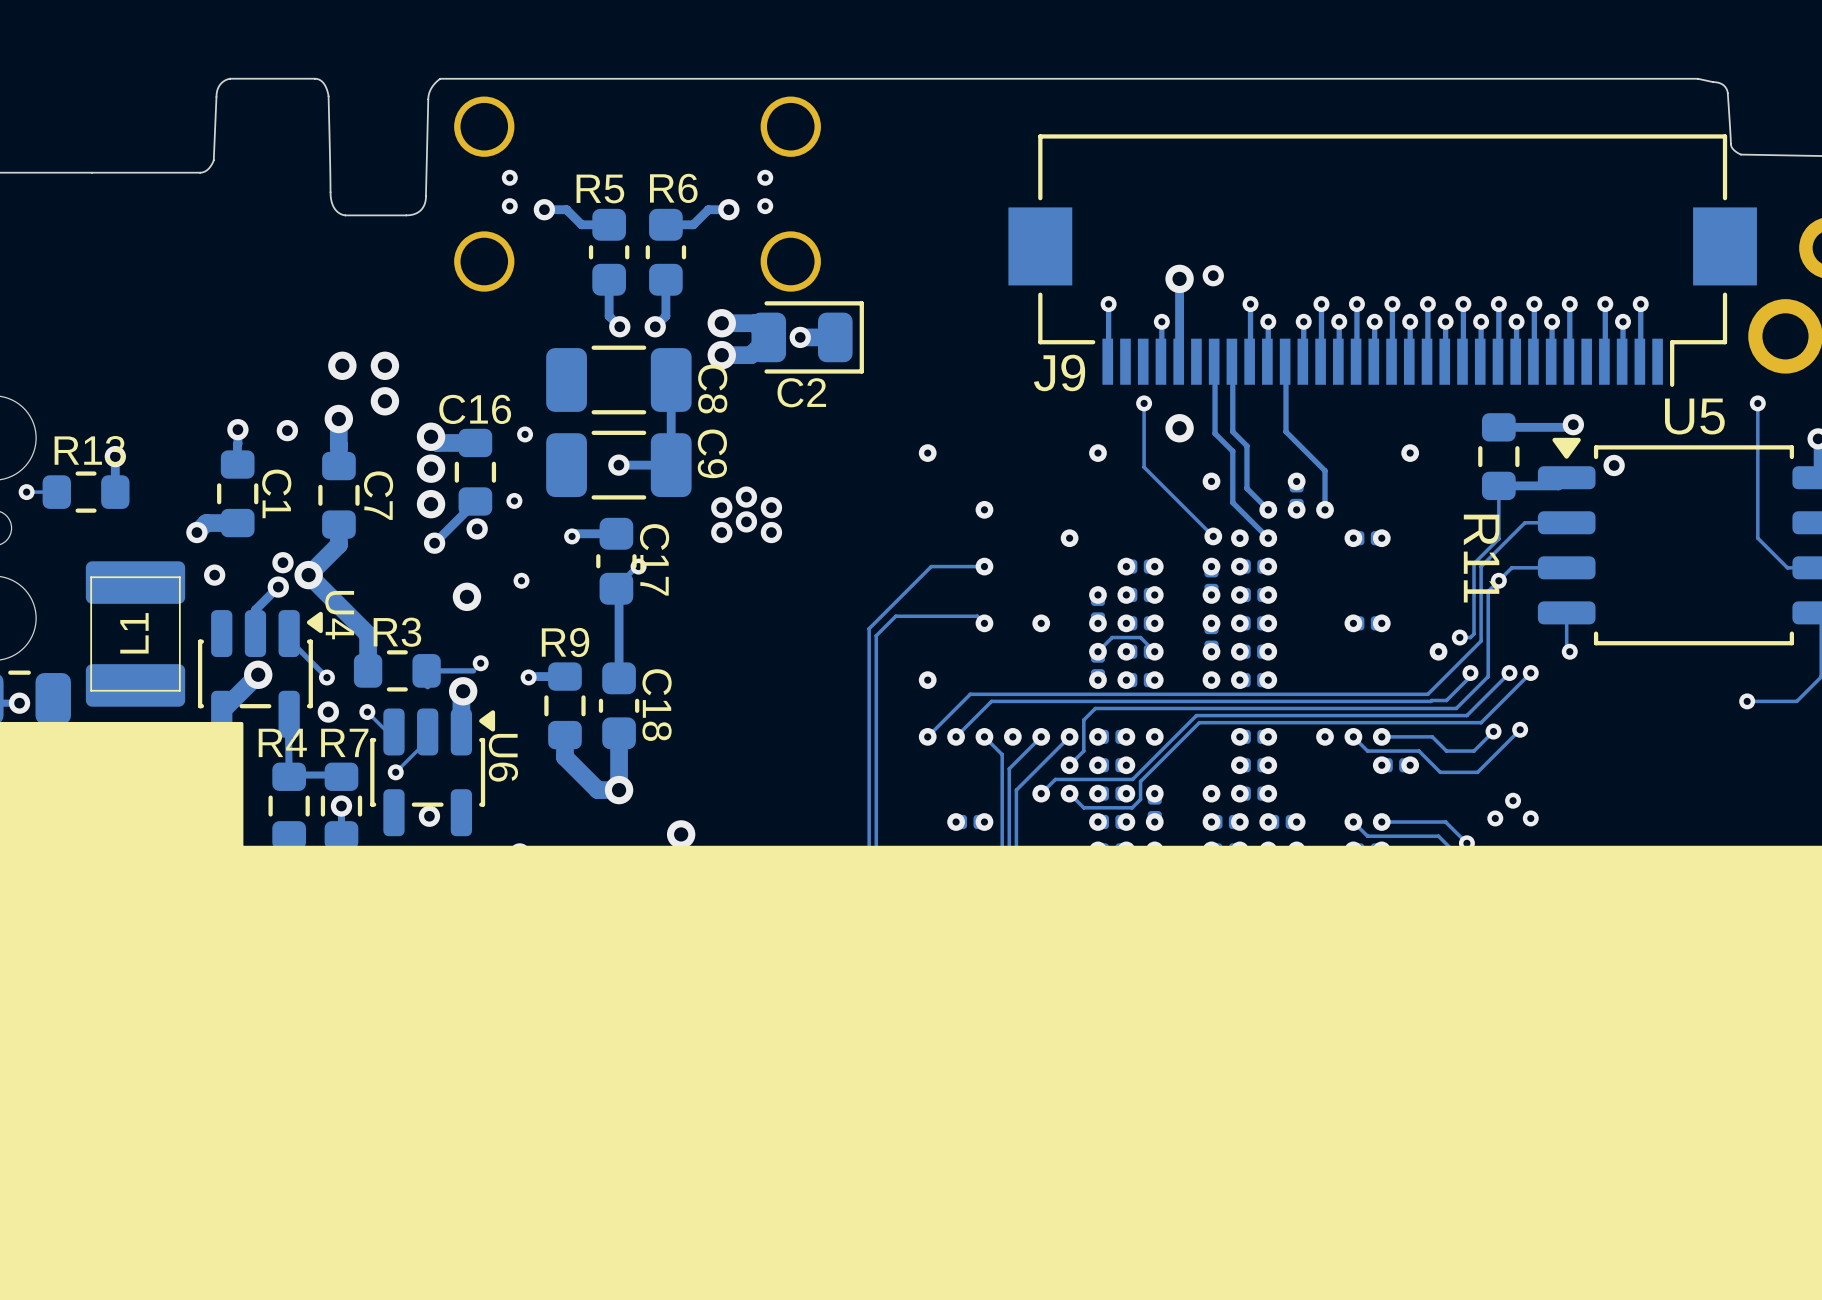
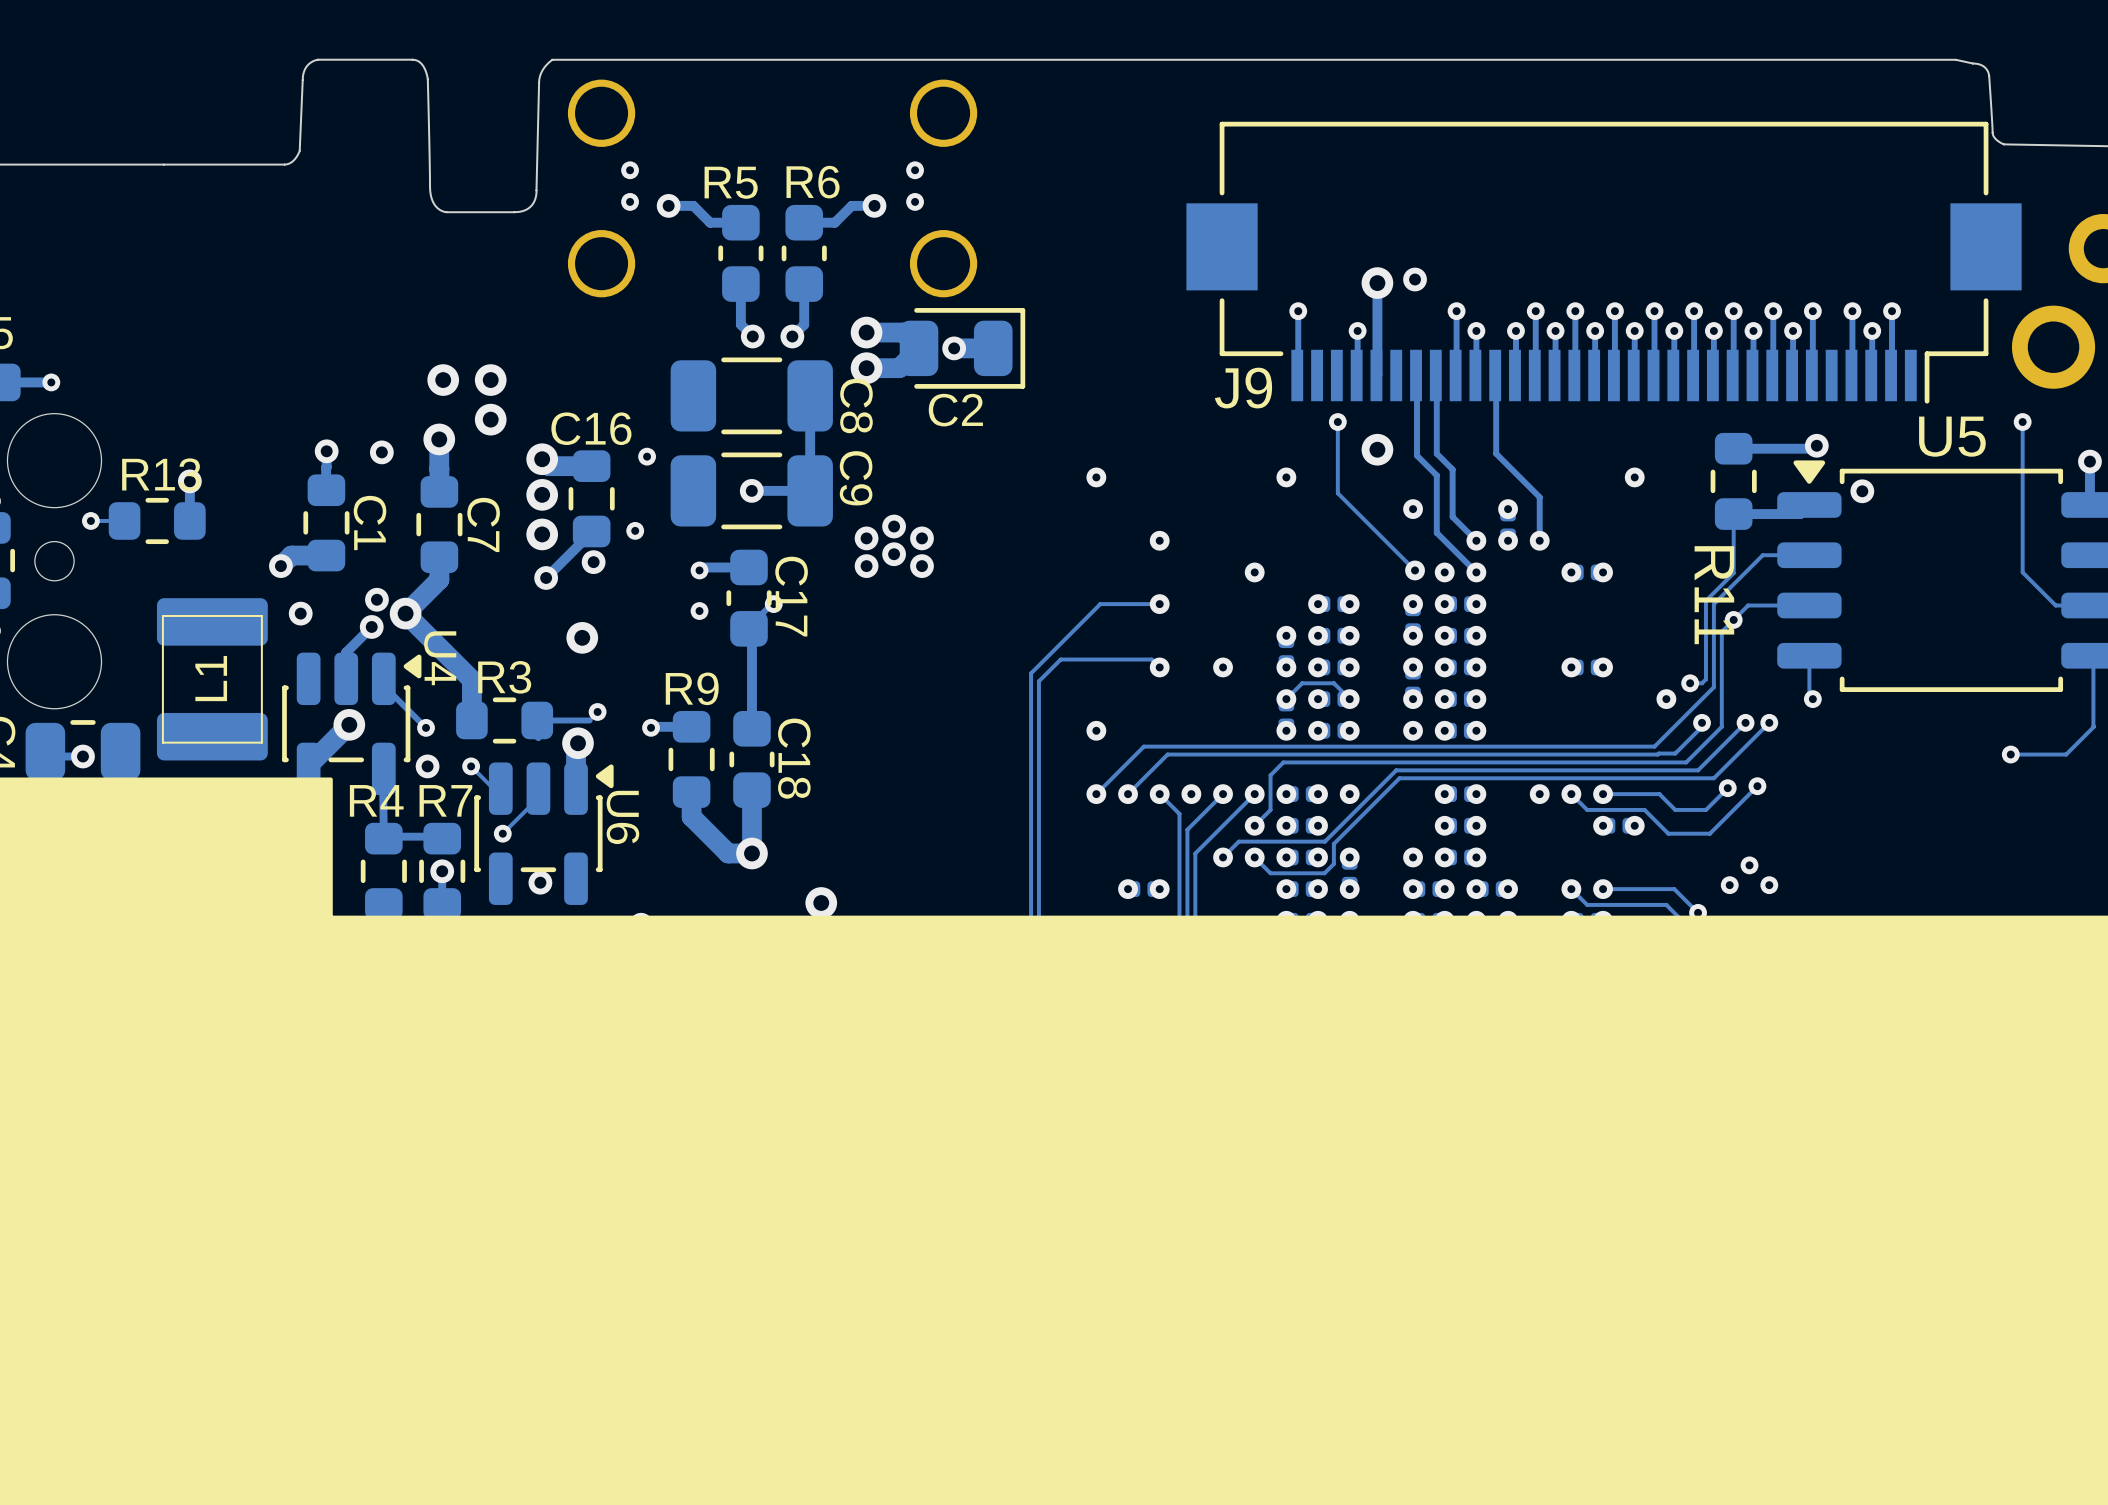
via position: (521, 580) -> (699, 611)

